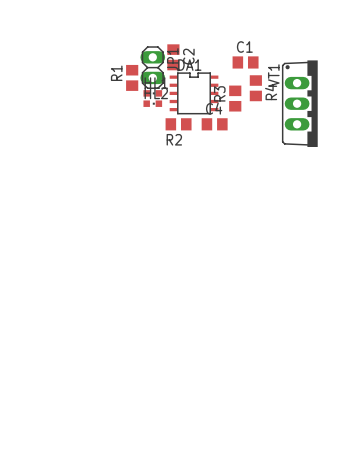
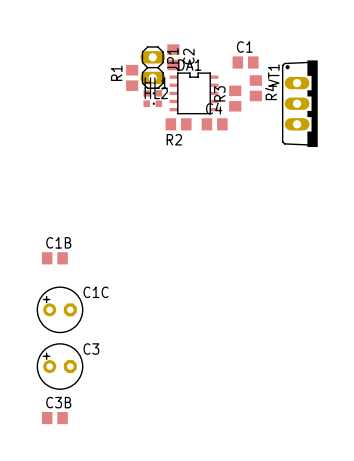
C1B: none -> (54, 258)
C1C: none -> (60, 309)
C3: none -> (60, 366)
C3B: none -> (54, 418)

